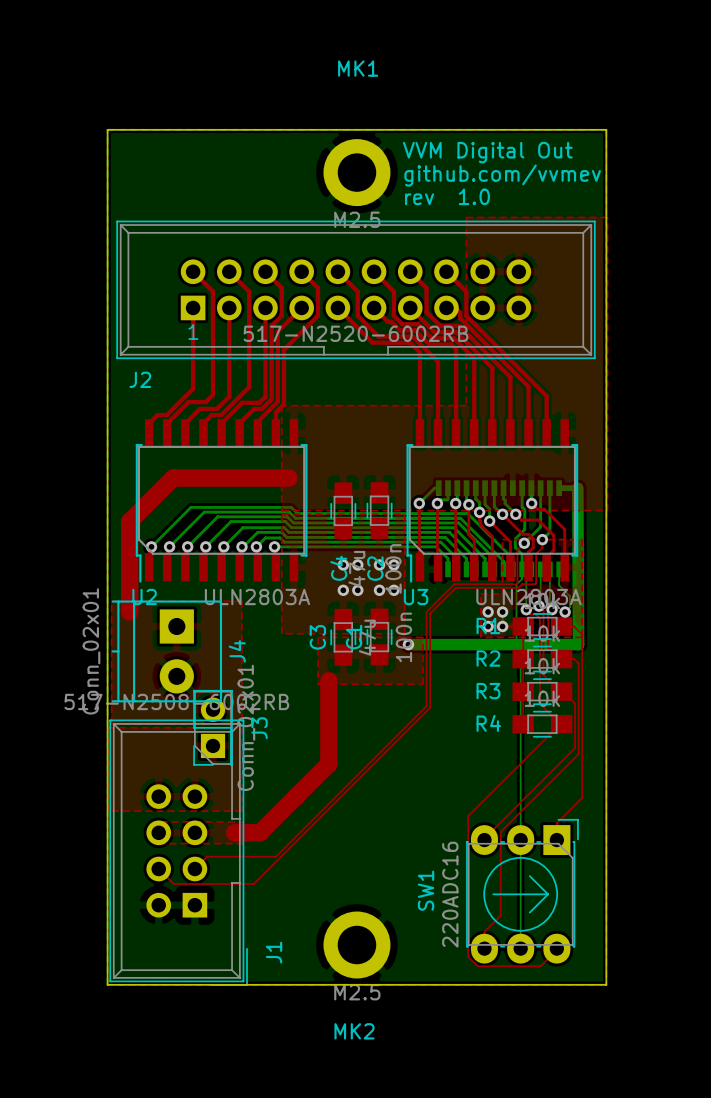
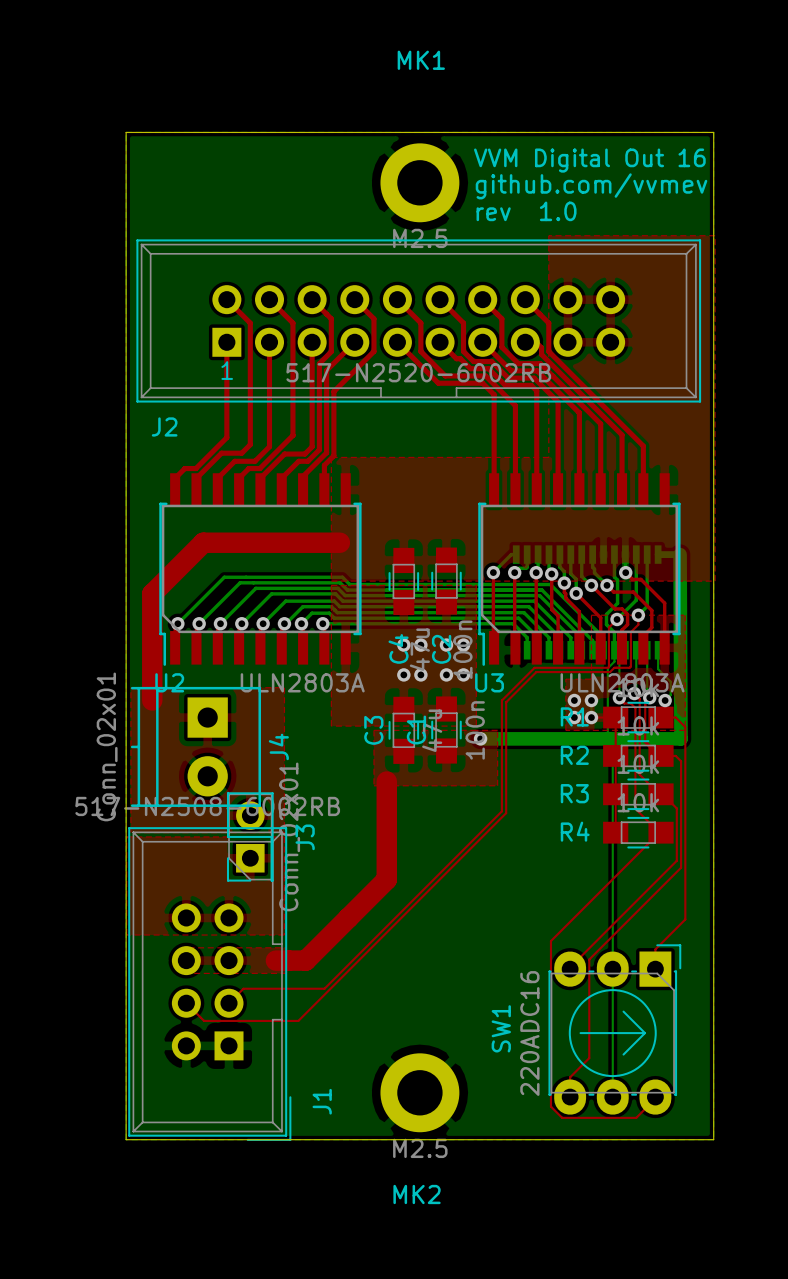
text: VVM Digital Out (487, 152) -> VVM Digital Out 16 (589, 160)

